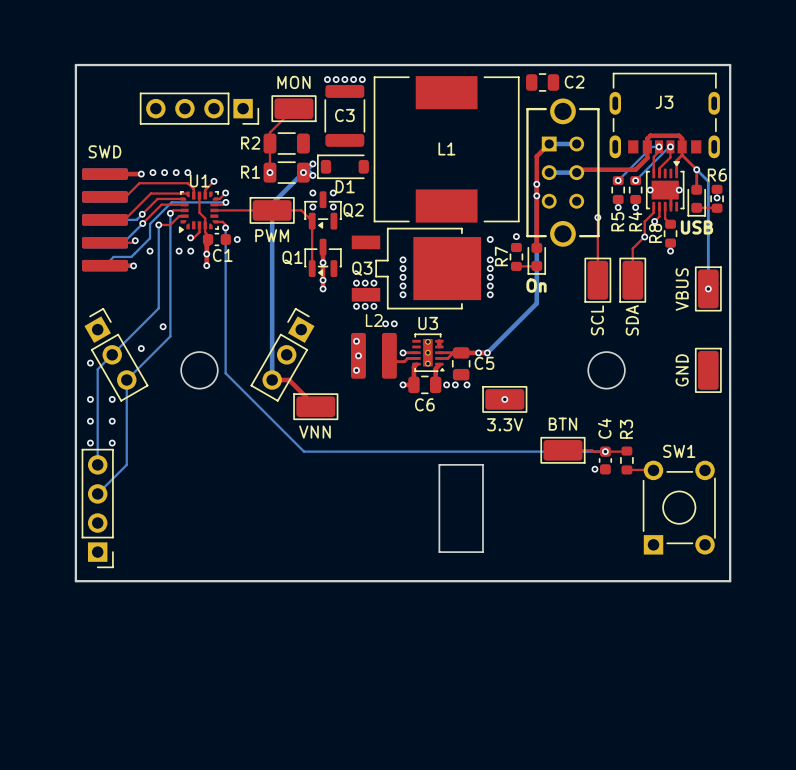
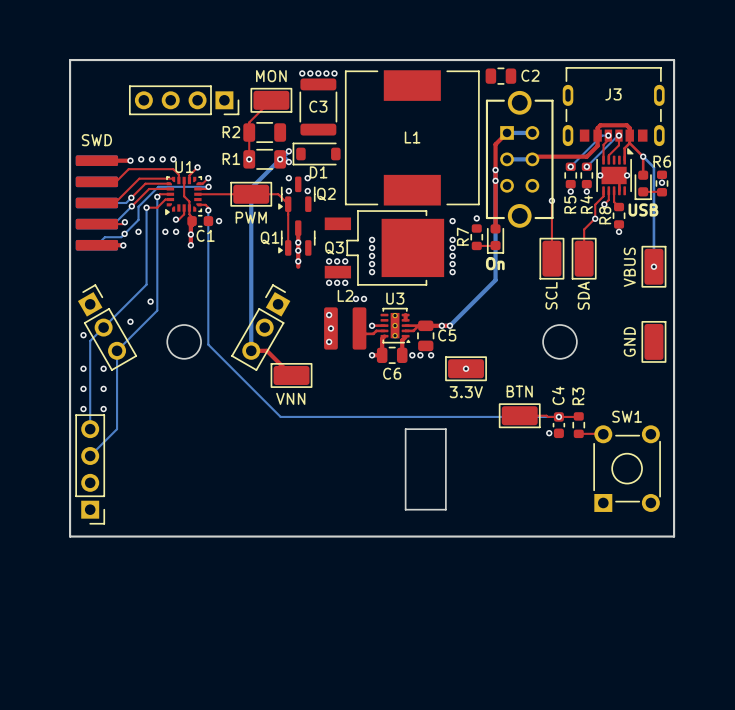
part footprint: [646, 161, 685, 212] -> [596, 148, 634, 196]
Q2 footprint: [304, 191, 342, 230] -> [278, 176, 316, 212]
Q1 footprint: [304, 238, 342, 278] -> [278, 220, 316, 256]
via: none -> (124, 233)
via: none -> (298, 250)
via: (323, 280) -> none
via: none -> (298, 261)
via: (323, 288) -> none

